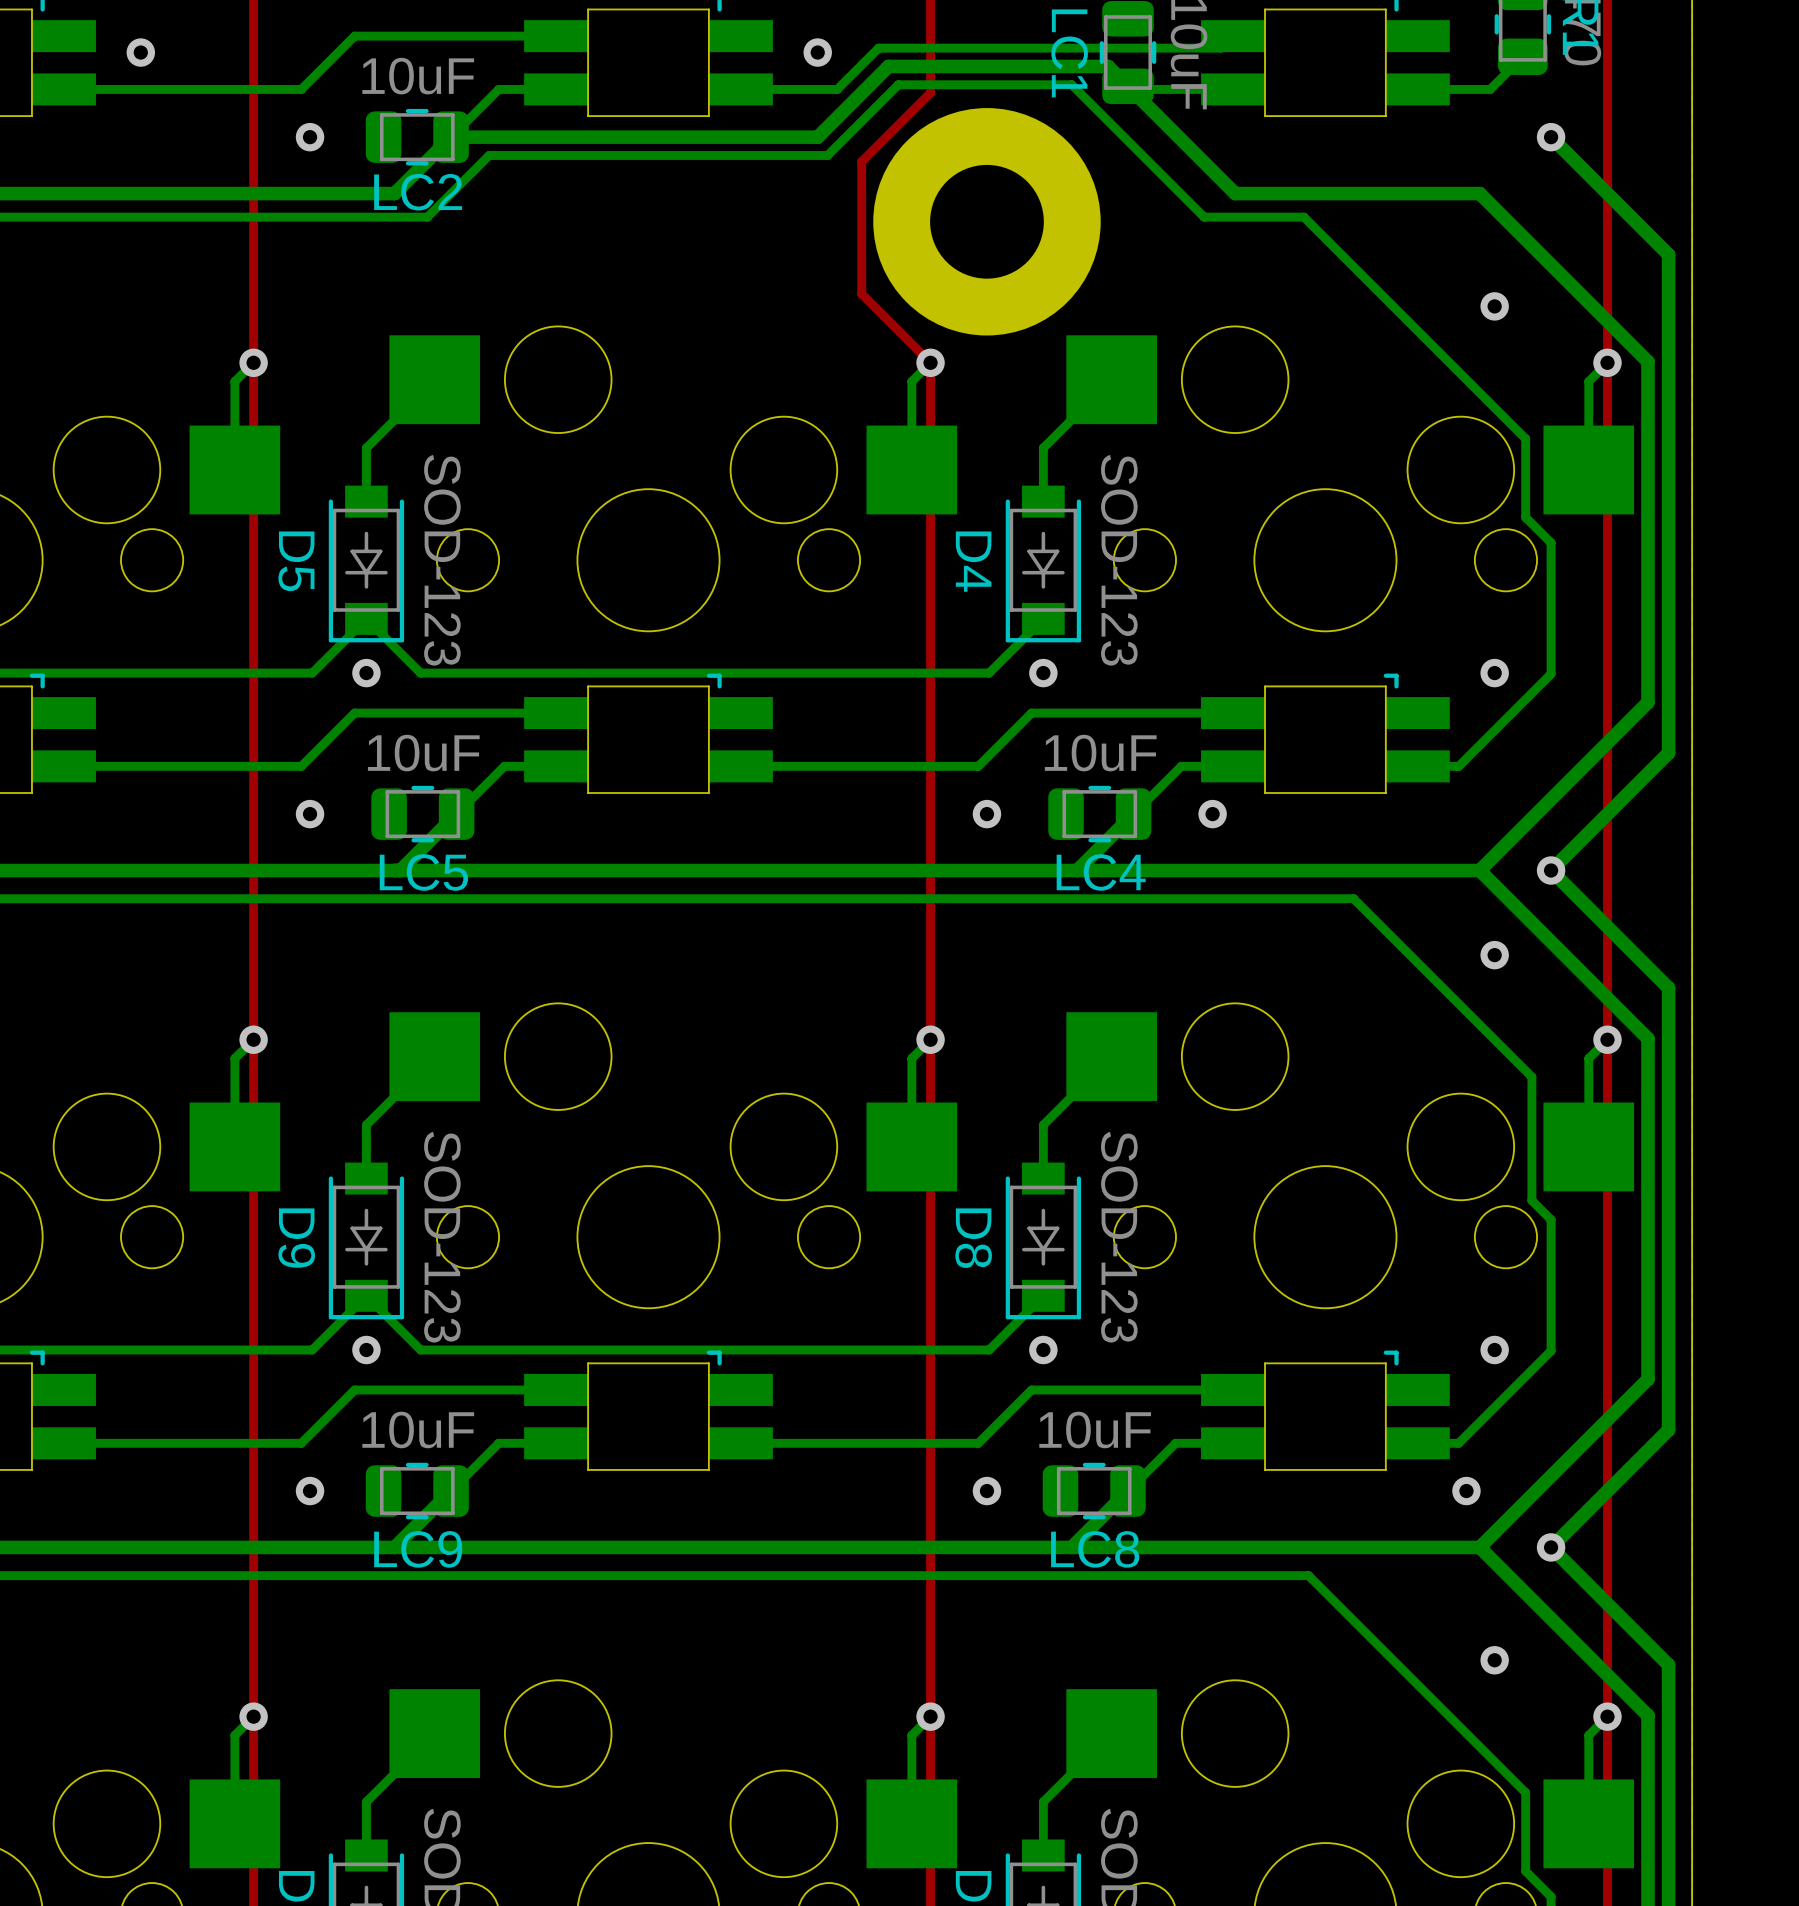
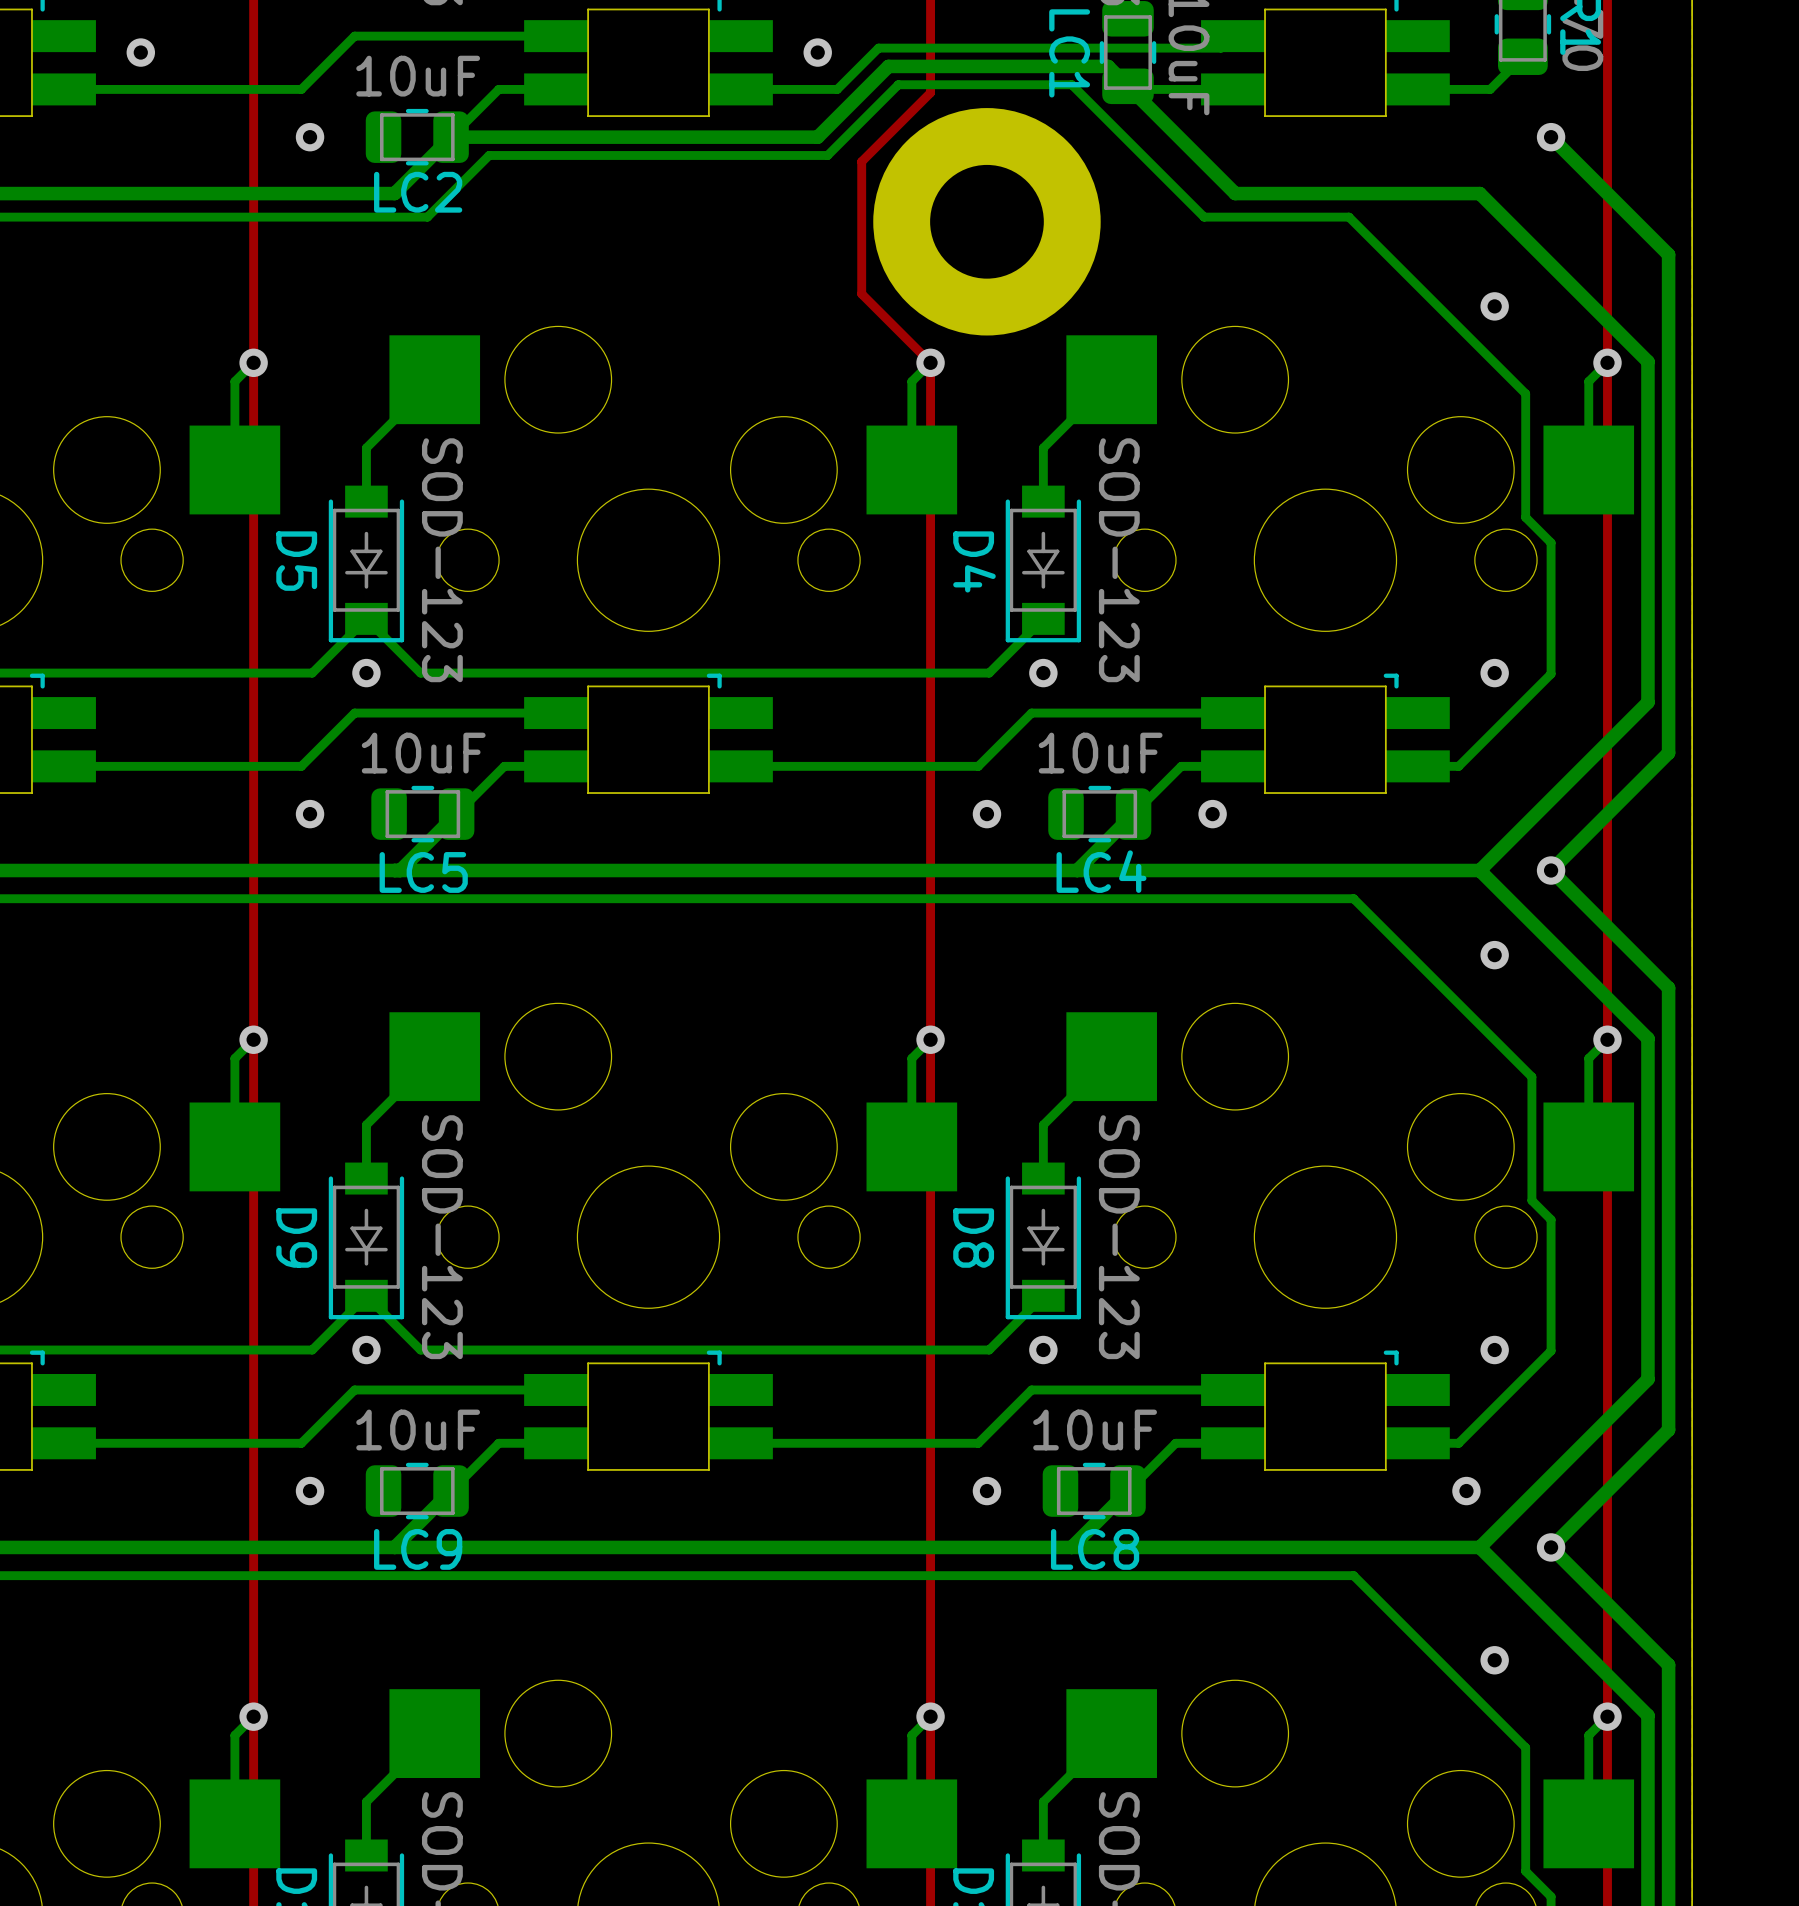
bottom track: (1303, 217) (1525, 438) -> (1303, 217) (1348, 217) (1525, 393) (1525, 438)
bottom track: (1308, 1575) (1525, 1792) -> (1308, 1575) (1353, 1575) (1525, 1747) (1525, 1792)

